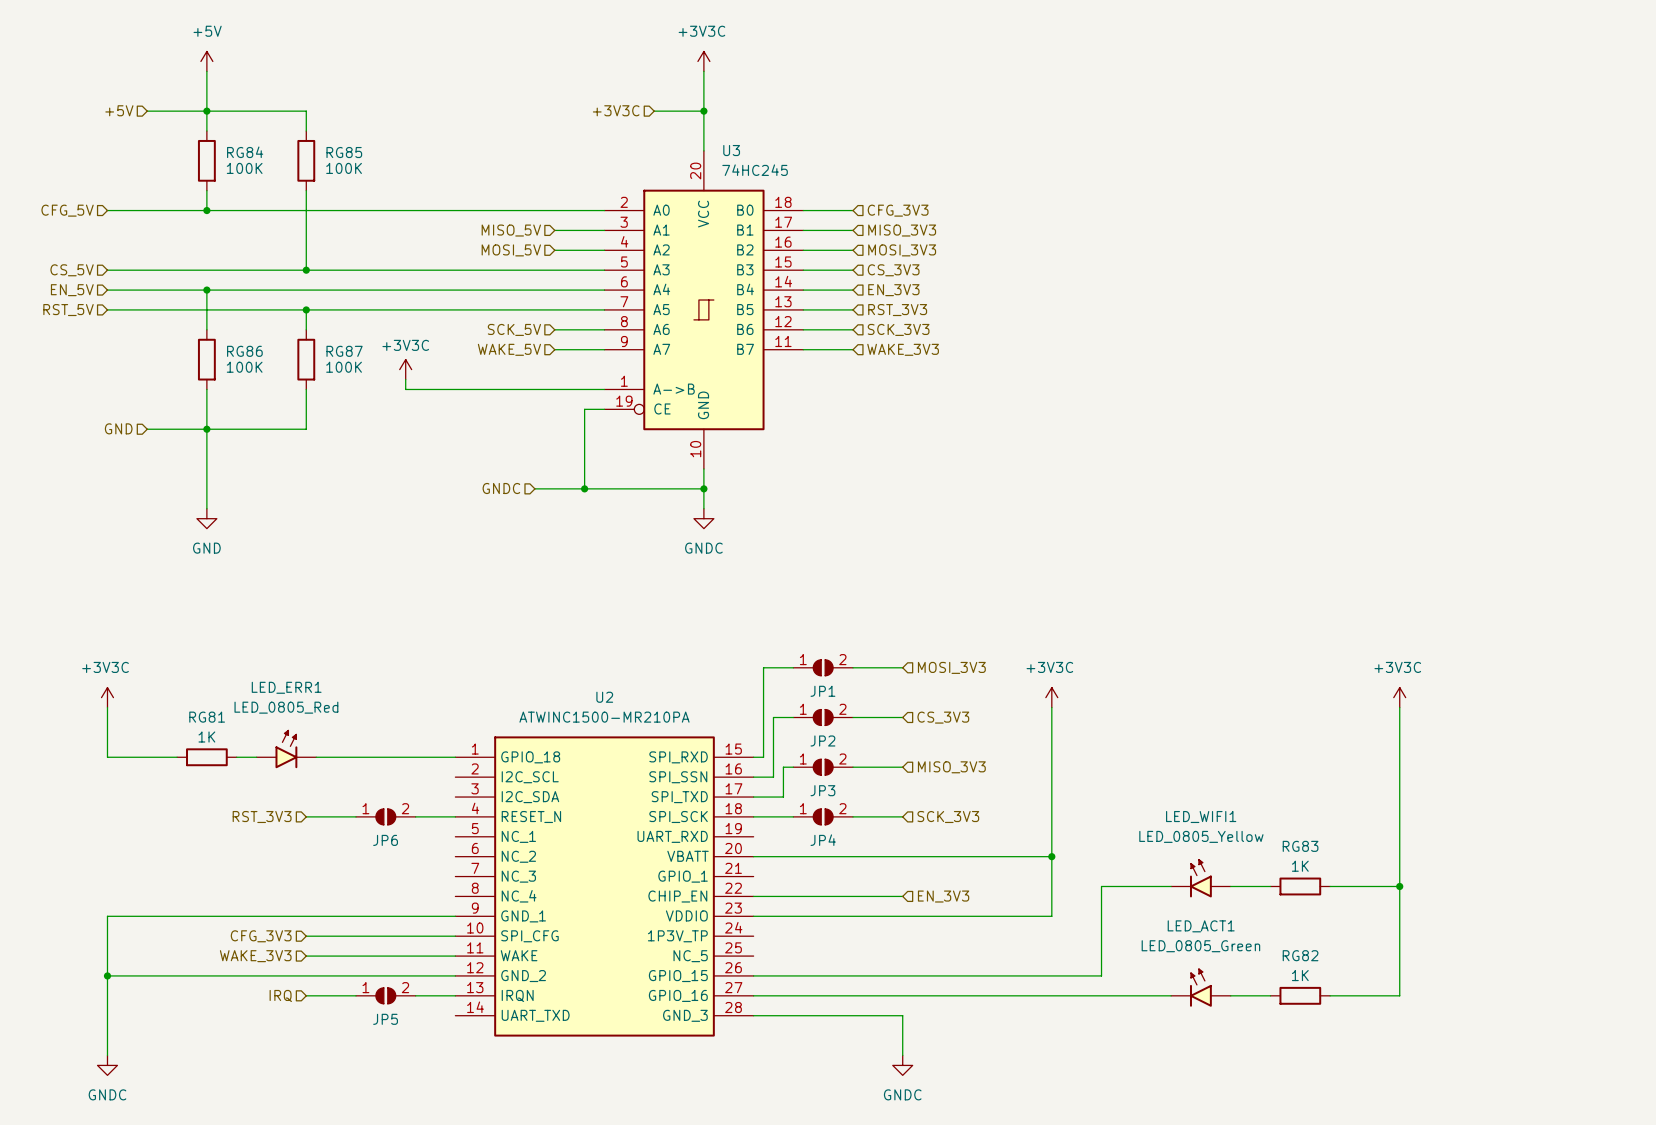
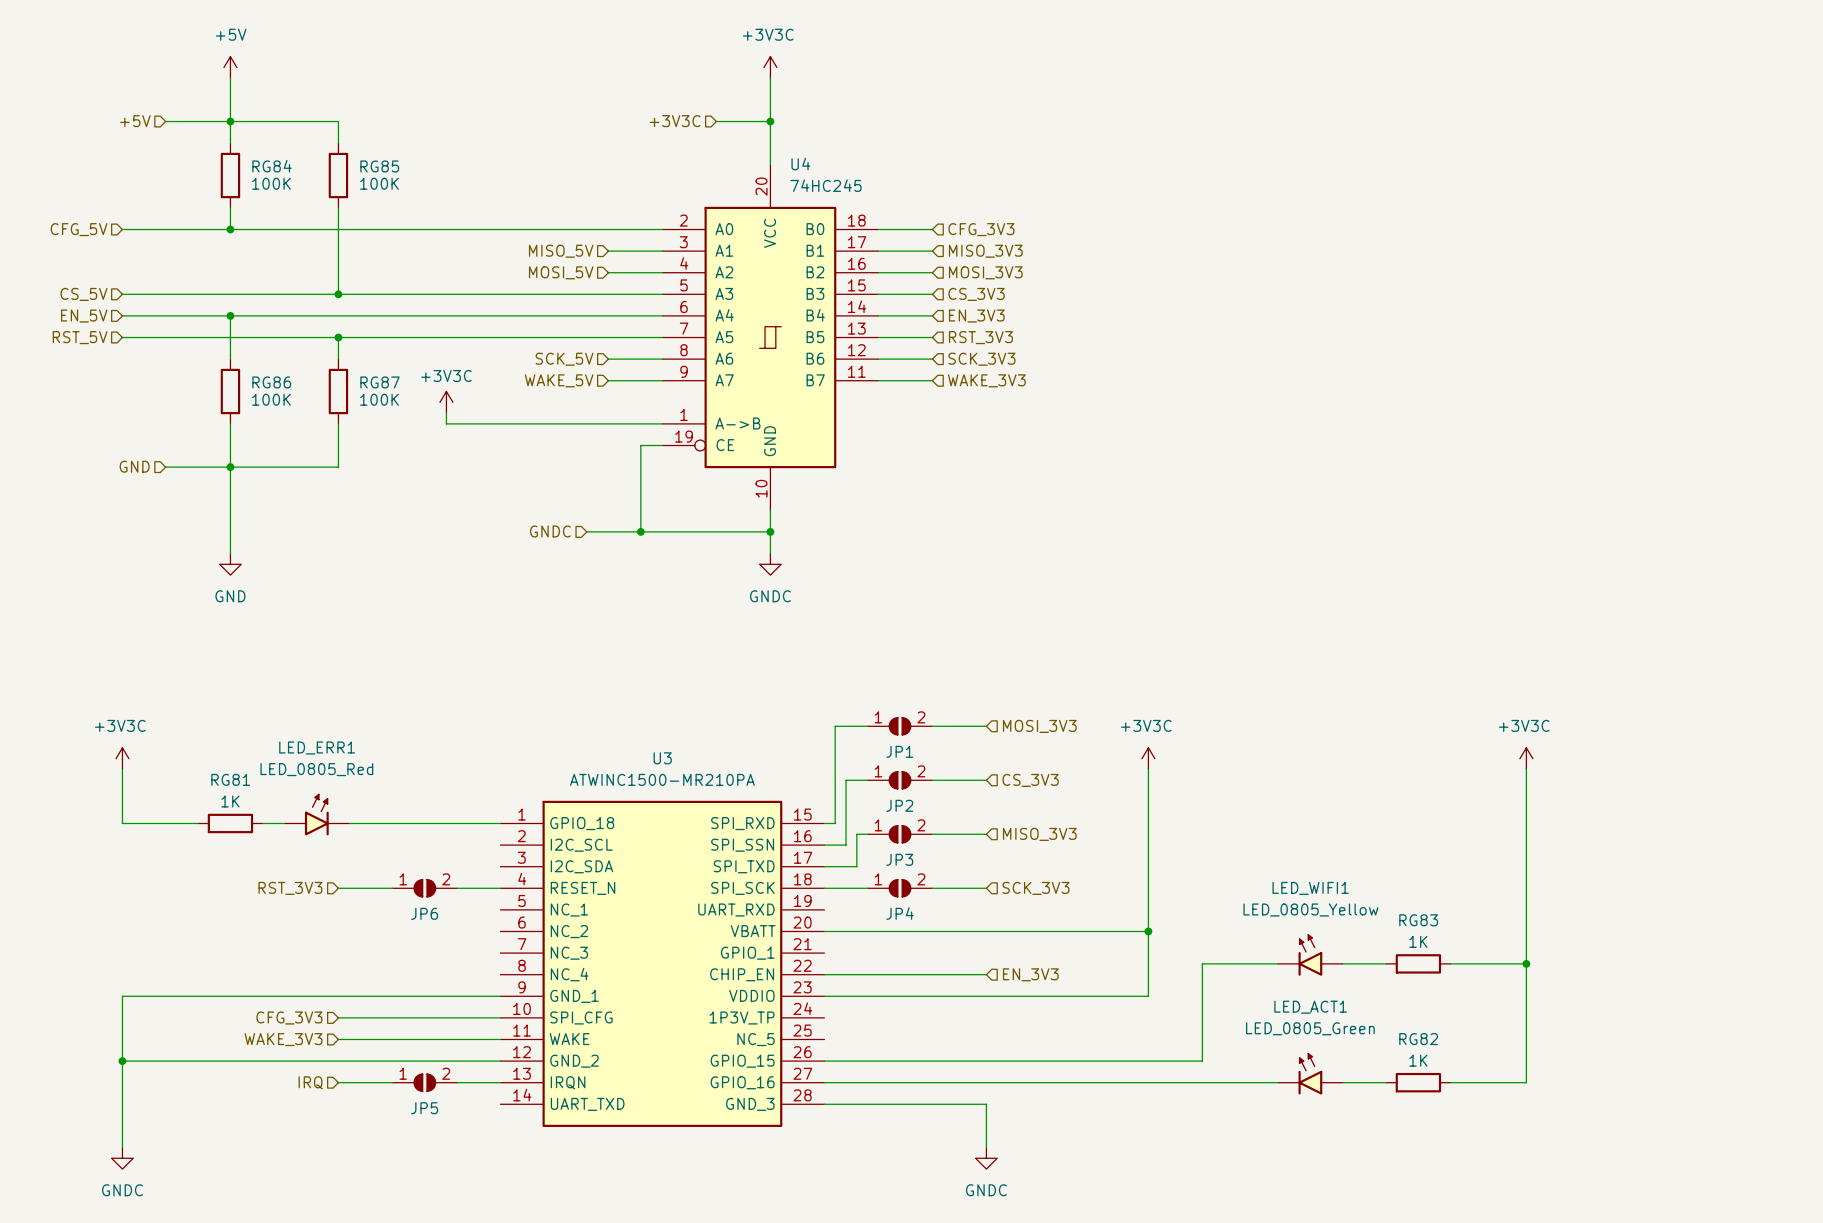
U3 name: U3 (731, 150) -> U4 (800, 164)
U2 name: U2 (604, 697) -> U3 (662, 758)

